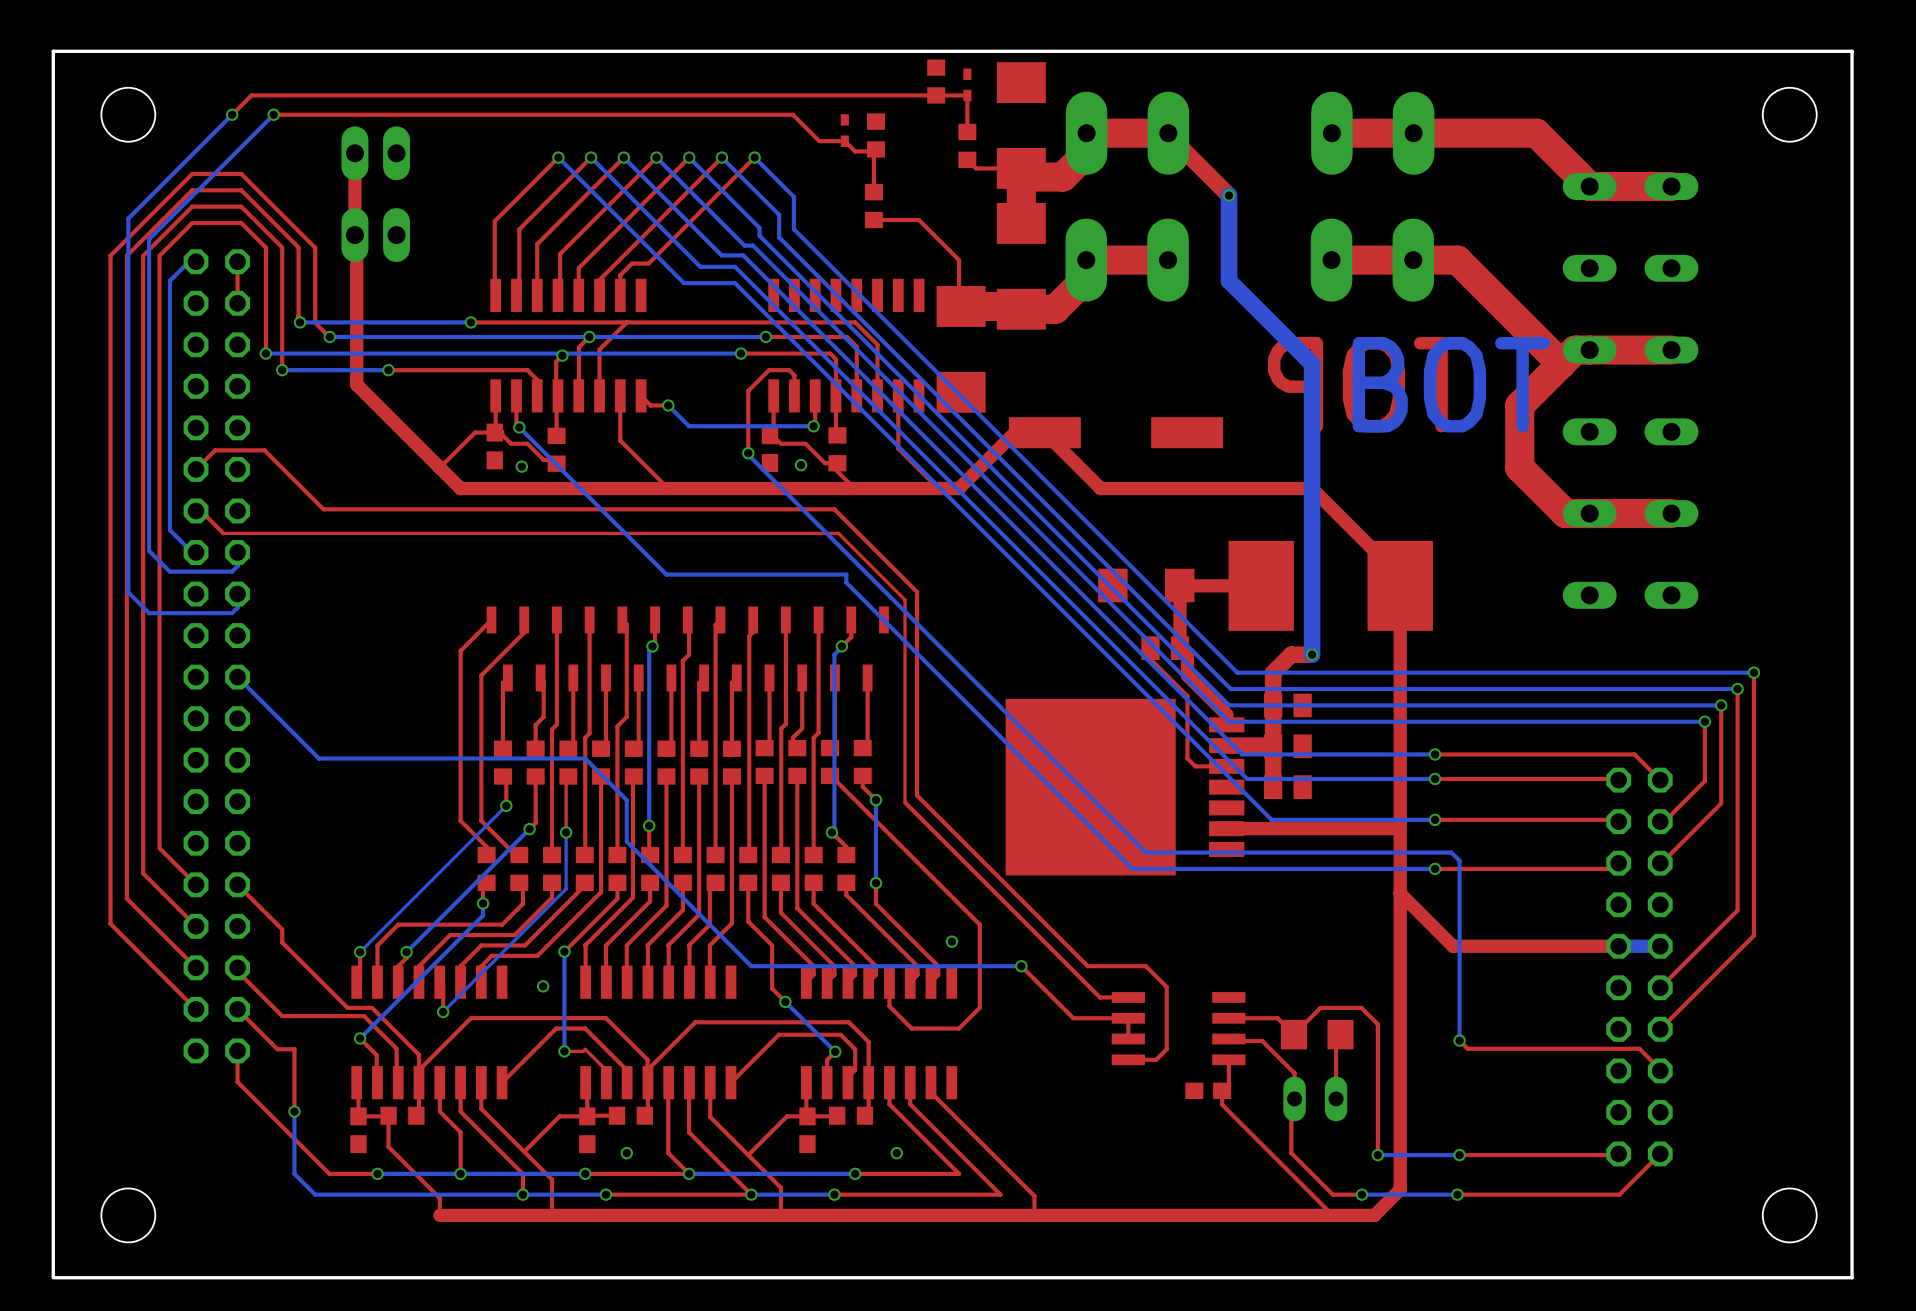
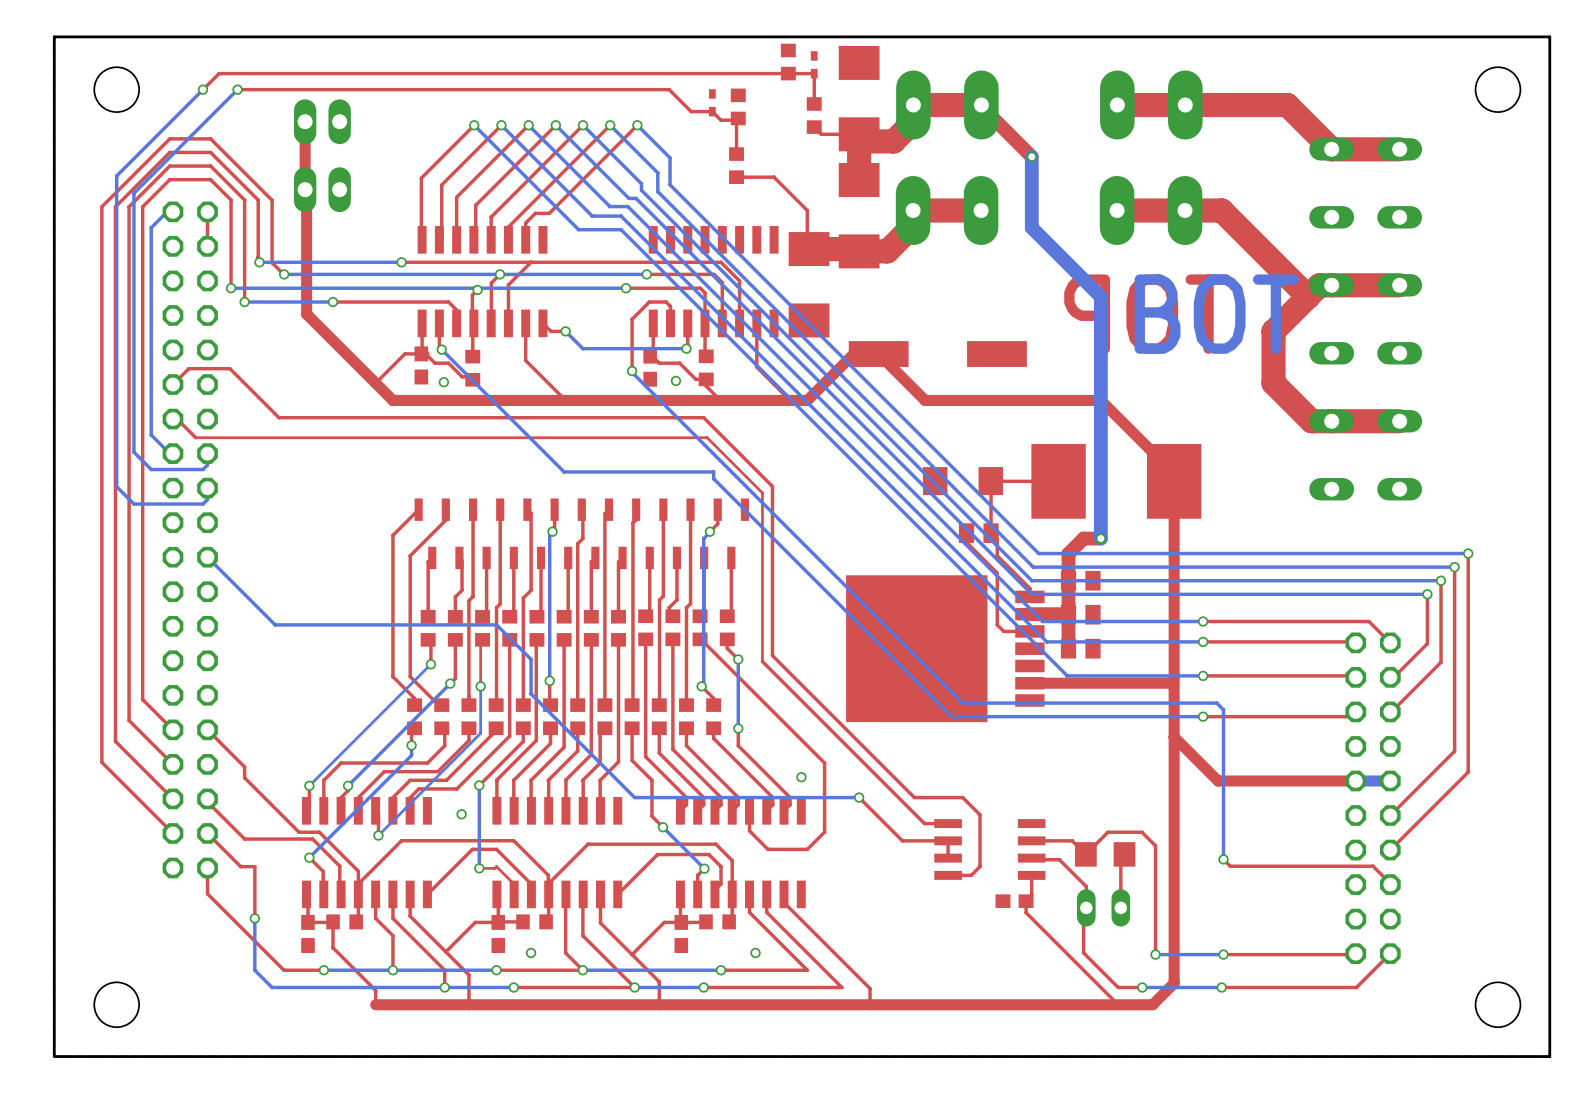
top track width: thick (1261, 585) (1187, 585) -> thin (1058, 481) (997, 481)
top track width: thick (1179, 593) (1179, 648) (1187, 655) (1187, 675) (1226, 714) (1226, 724) -> thin (991, 487) (991, 533) (997, 539) (997, 555) (1029, 588) (1029, 596)

